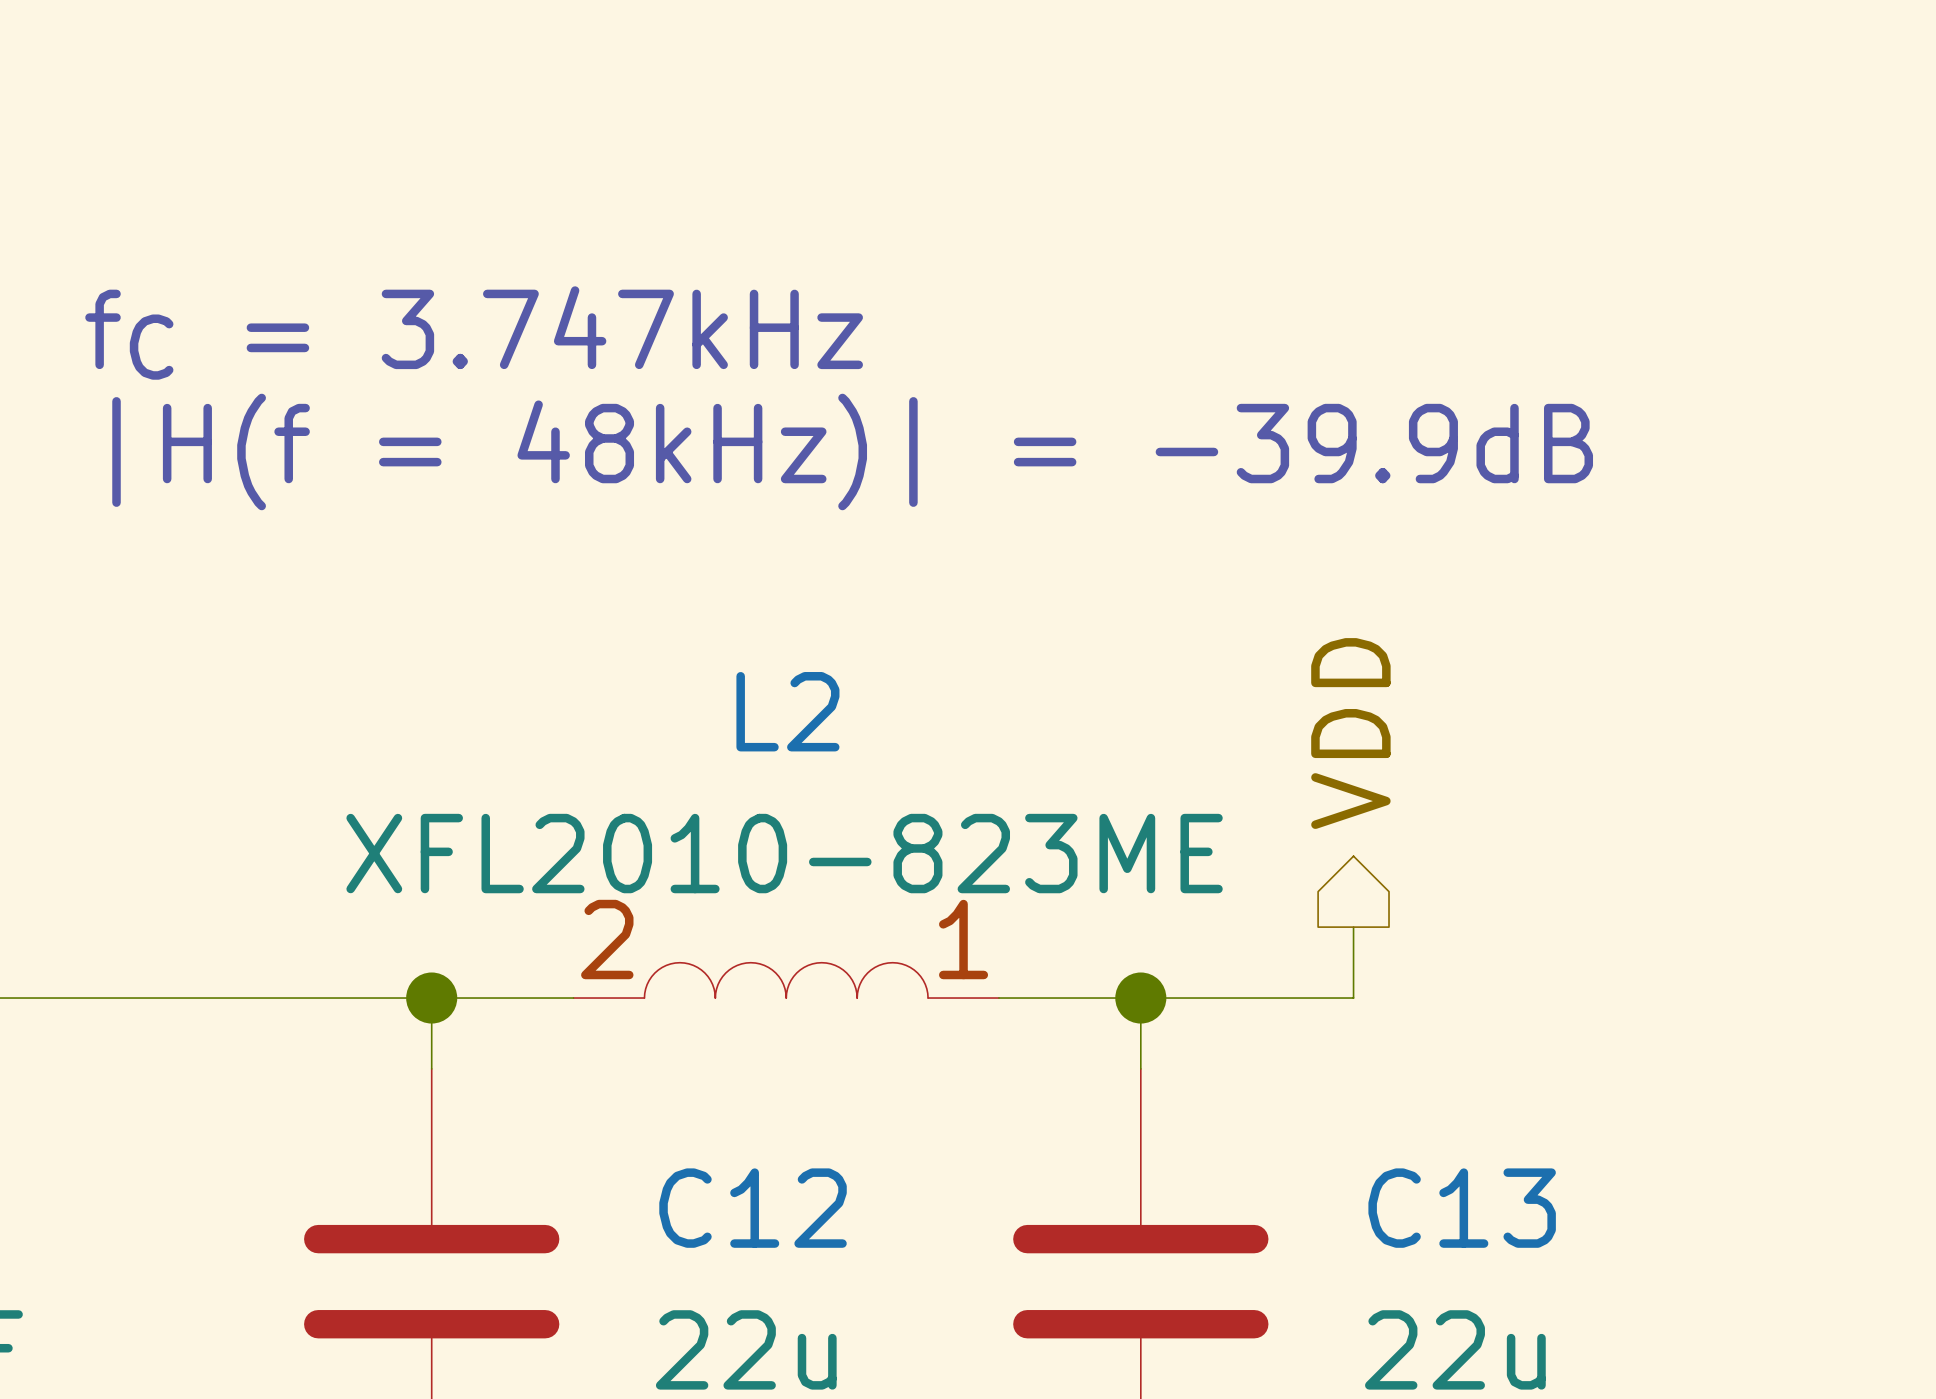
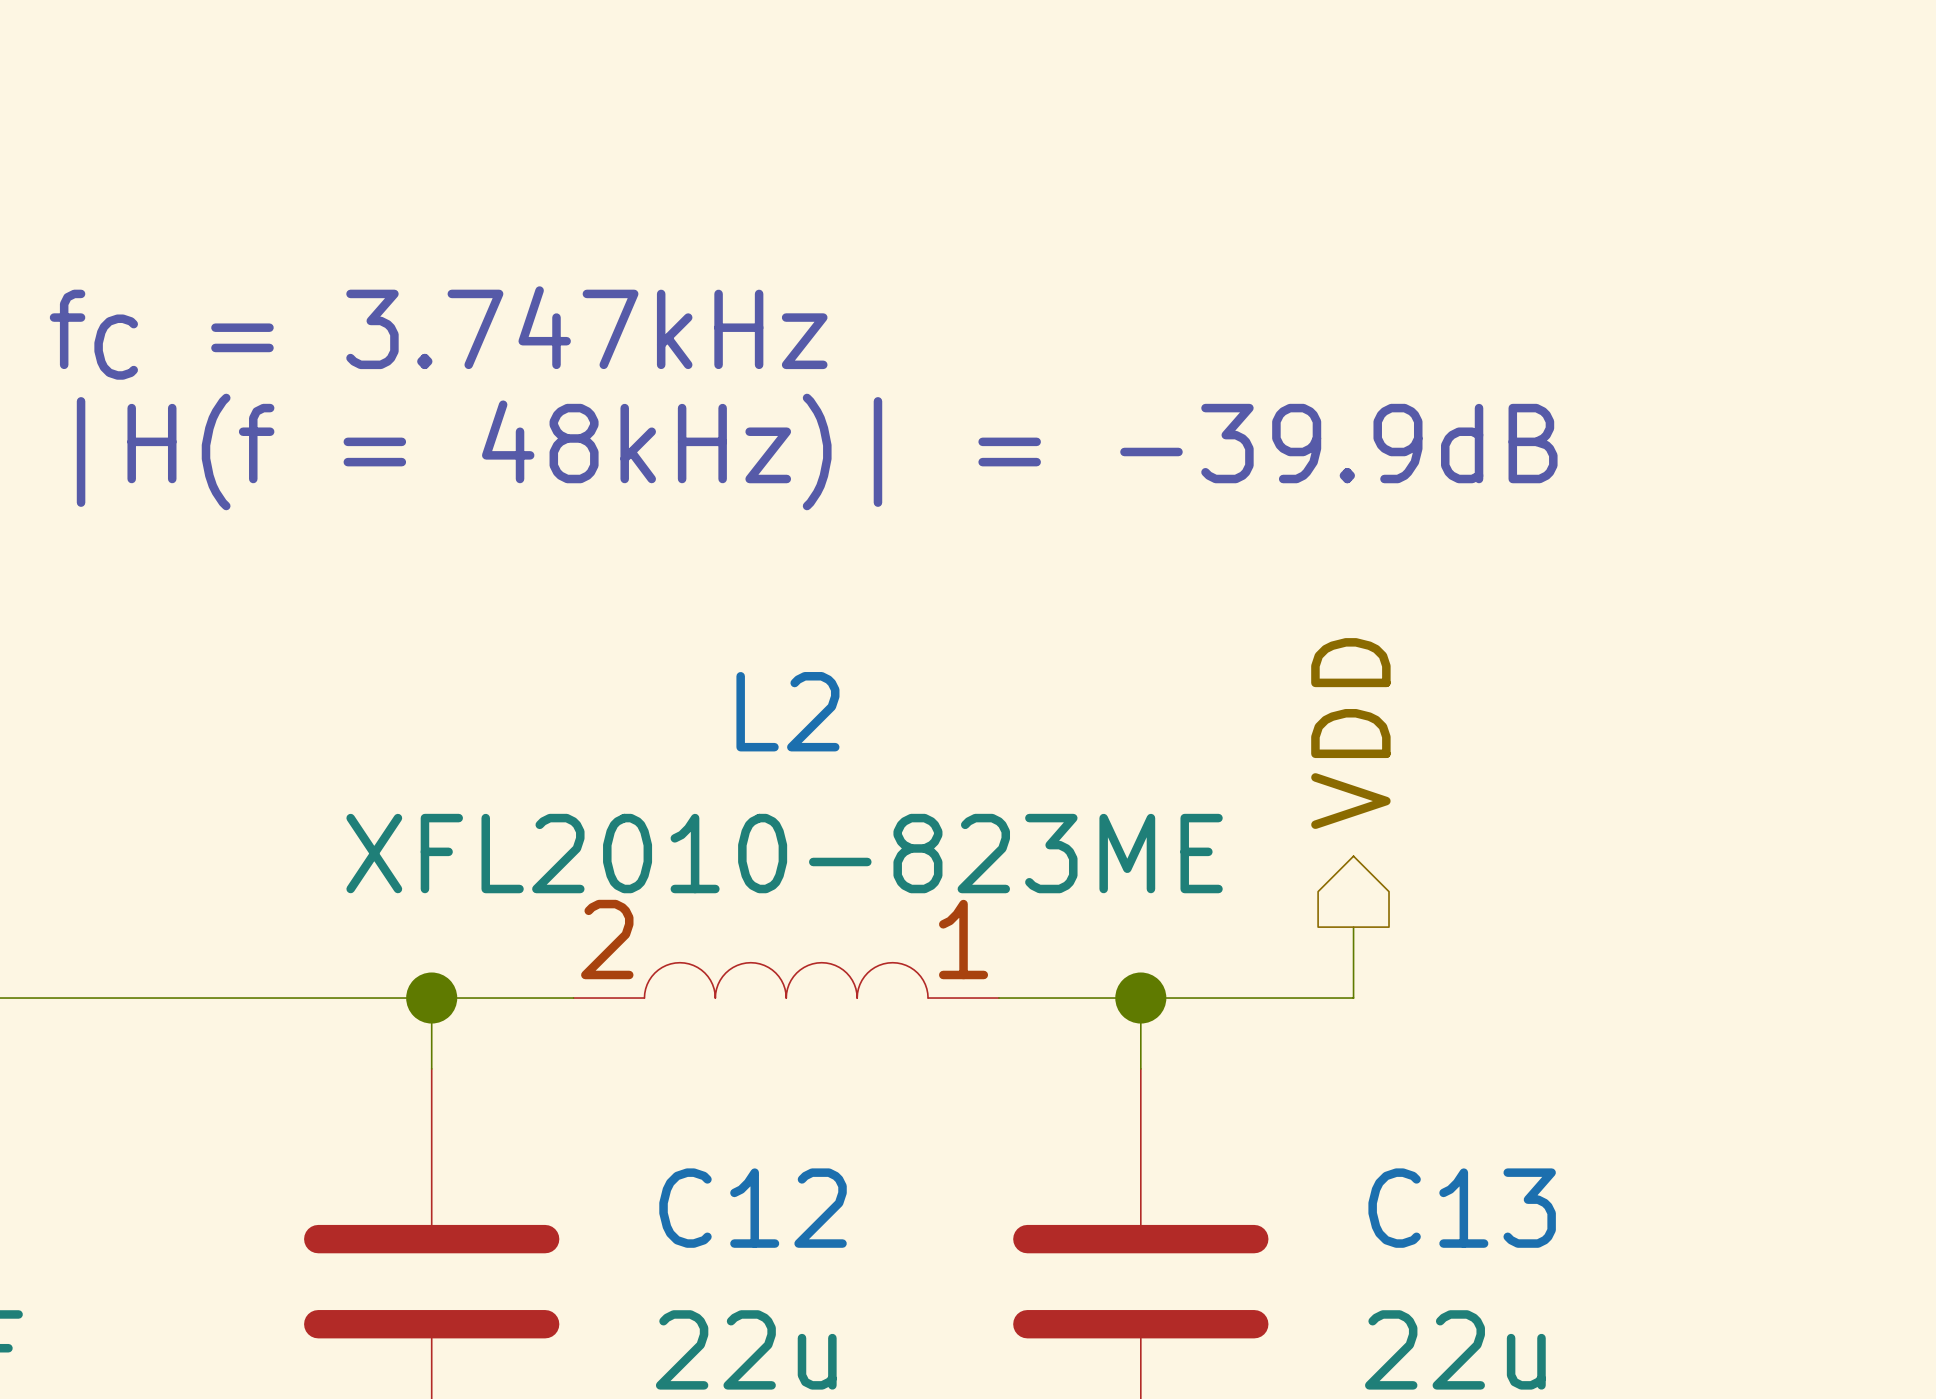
text position: fC = 3.747kHz (474, 333) -> fC = 3.747kHz (438, 333)
text position: |H(f = 48kHz)| = -39.9dB (852, 451) -> |H(f = 48kHz)| = -39.9dB (817, 451)

